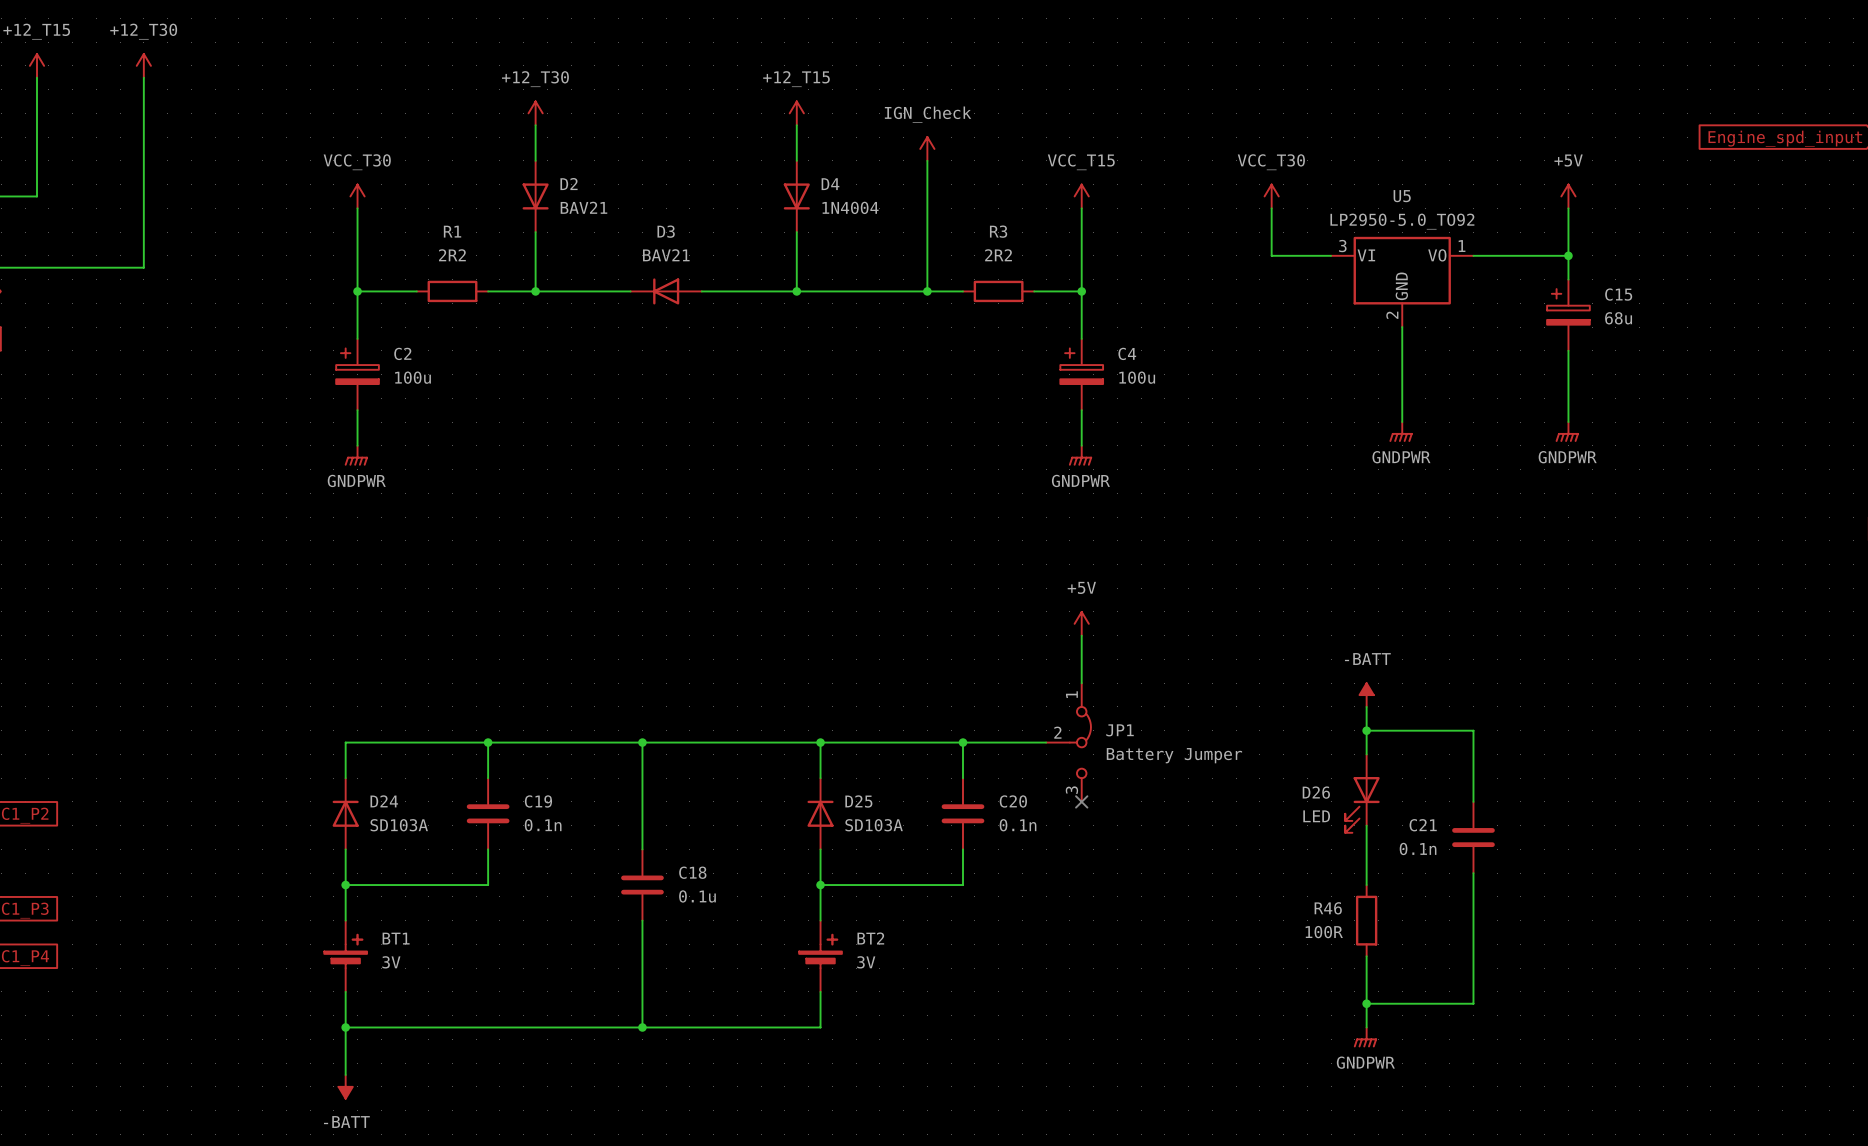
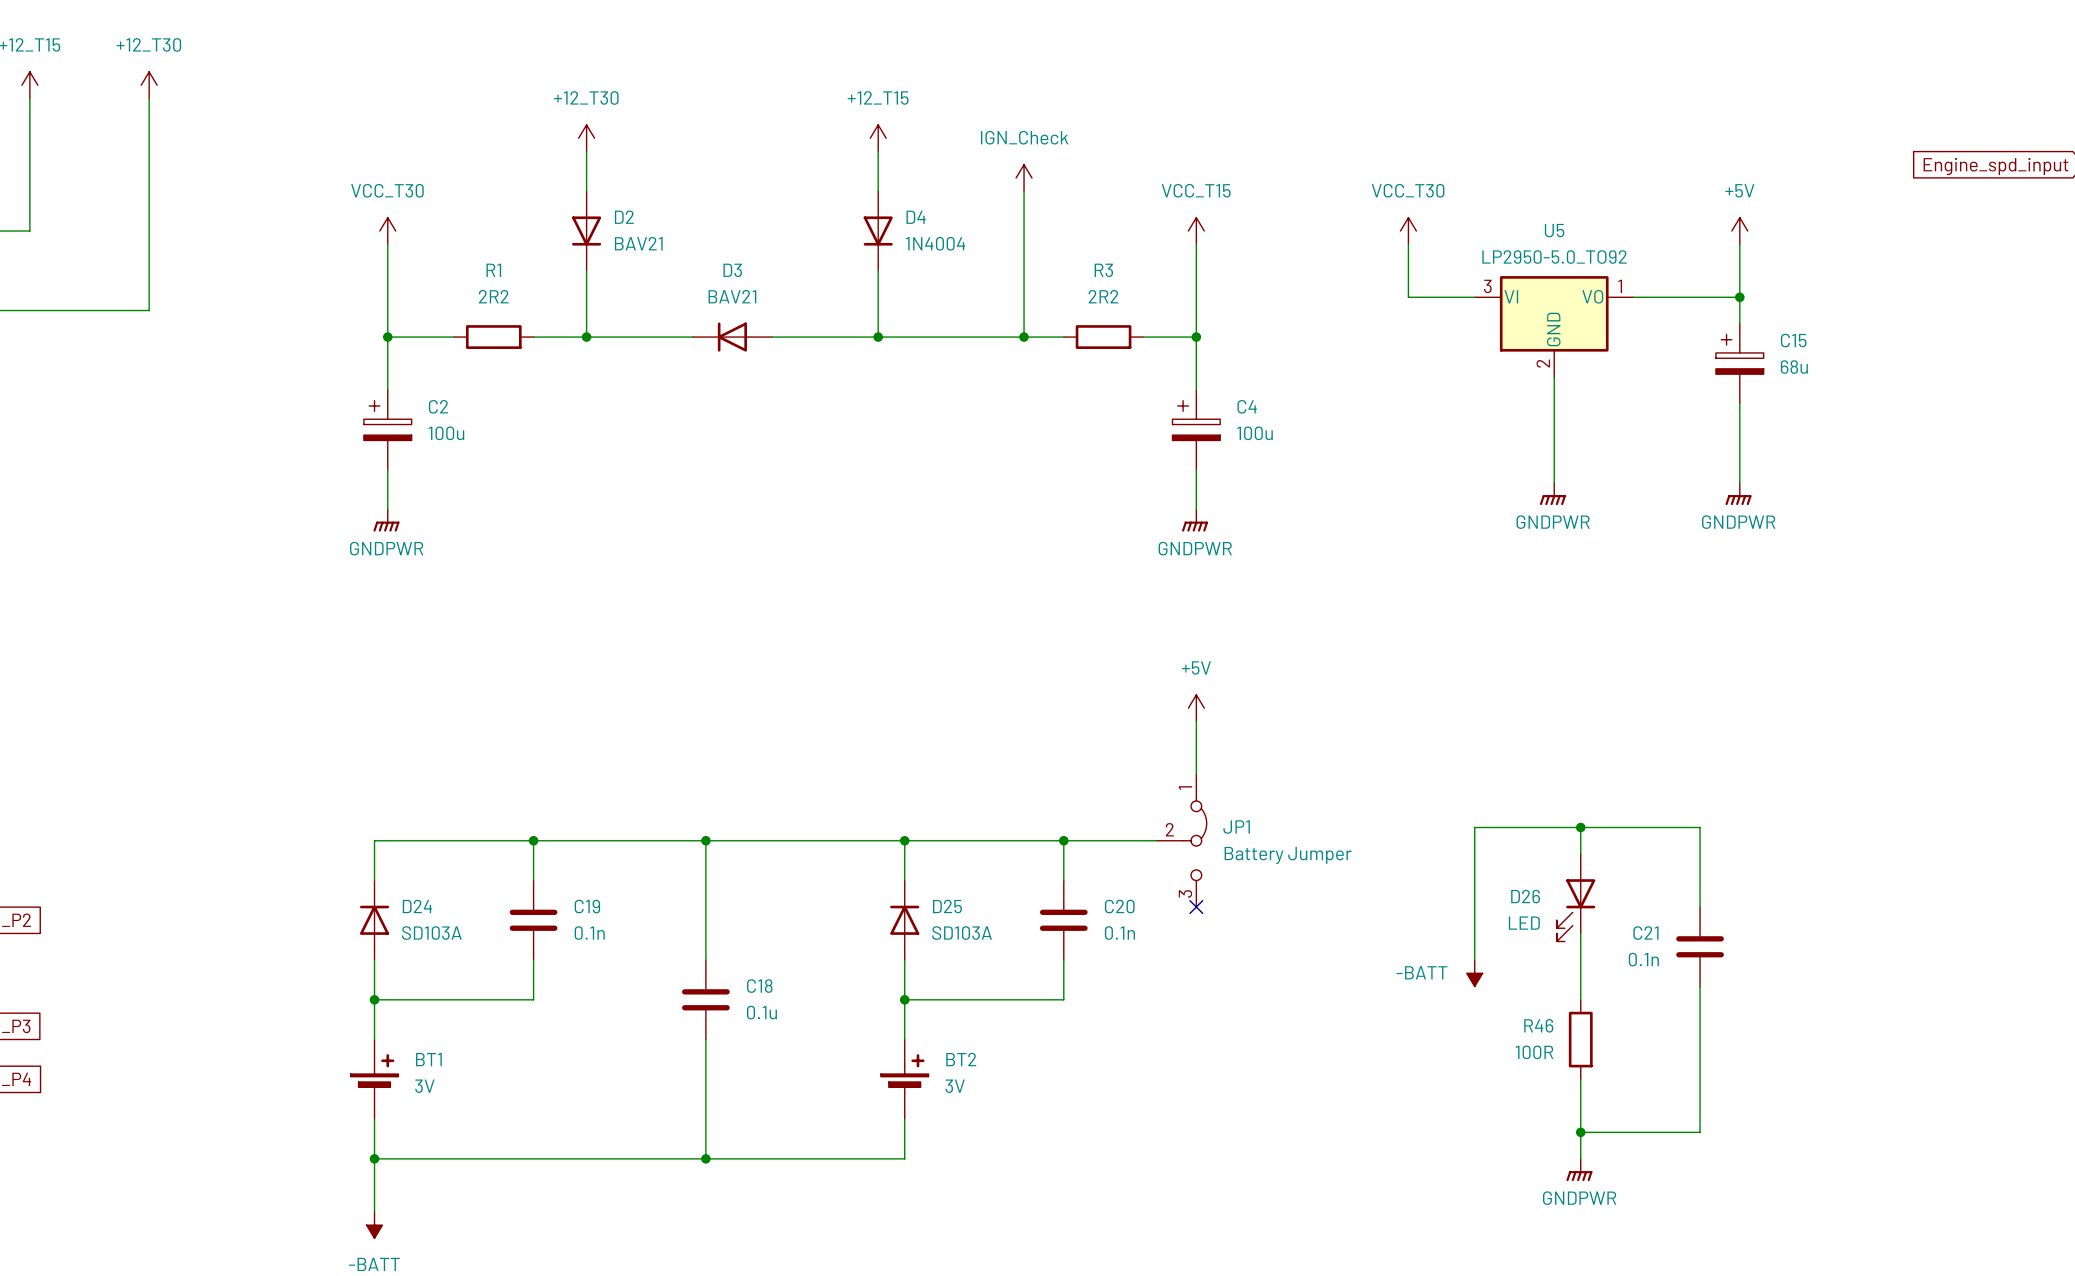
power symbol text position: -BATT (1367, 659) -> -BATT (1421, 972)
power symbol rotation: 0° (1366, 695) -> 180° (1474, 973)
power symbol position: -BATT (1366, 695) -> -BATT (1474, 973)
wire: (1366, 706) (1366, 754) -> none
wire: none -> (1514, 827) (1474, 827) (1474, 960)
junction: (1366, 730) -> none
wire: none -> (1580, 827) (1580, 854)
junction: none -> (1580, 827)
wire: (1473, 730) (1473, 801) -> (1633, 827) (1700, 827) (1700, 907)
D26 position: (1362, 793) -> (1576, 897)
wire: (1366, 825) (1366, 885) -> (1580, 933) (1580, 999)
C21 position: (1473, 837) -> (1700, 946)
wire: (1473, 873) (1473, 1003) -> (1700, 986) (1700, 1132) (1633, 1132)
R46 position: (1366, 920) -> (1580, 1039)
wire: (1366, 956) (1366, 1027) -> (1580, 1079) (1580, 1158)
wire: (1366, 1003) (1425, 1003) -> none
junction: (1366, 1003) -> none
junction: none -> (1580, 1132)
power symbol position: GNDPWR (1365, 1037) -> GNDPWR (1579, 1170)

